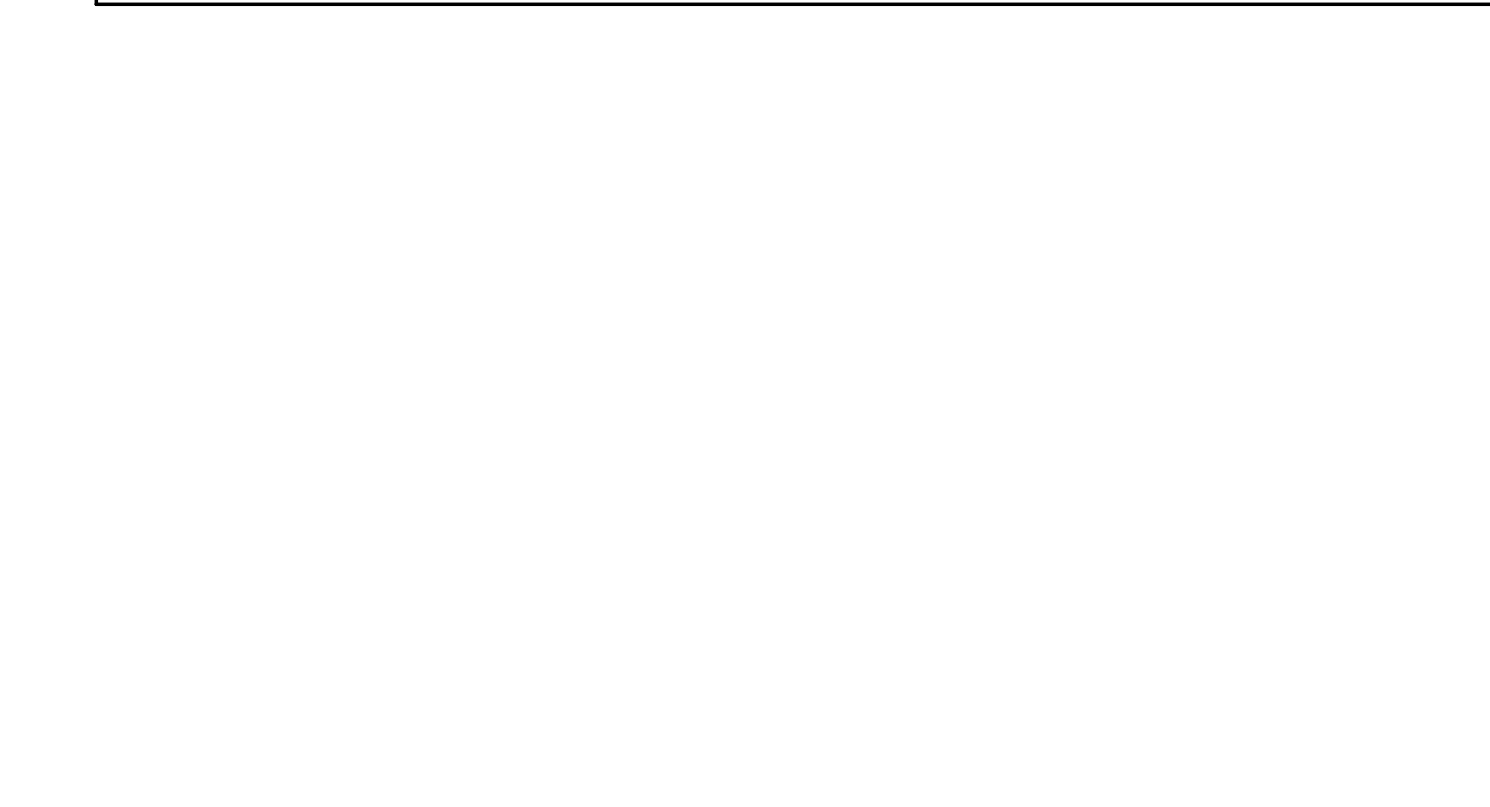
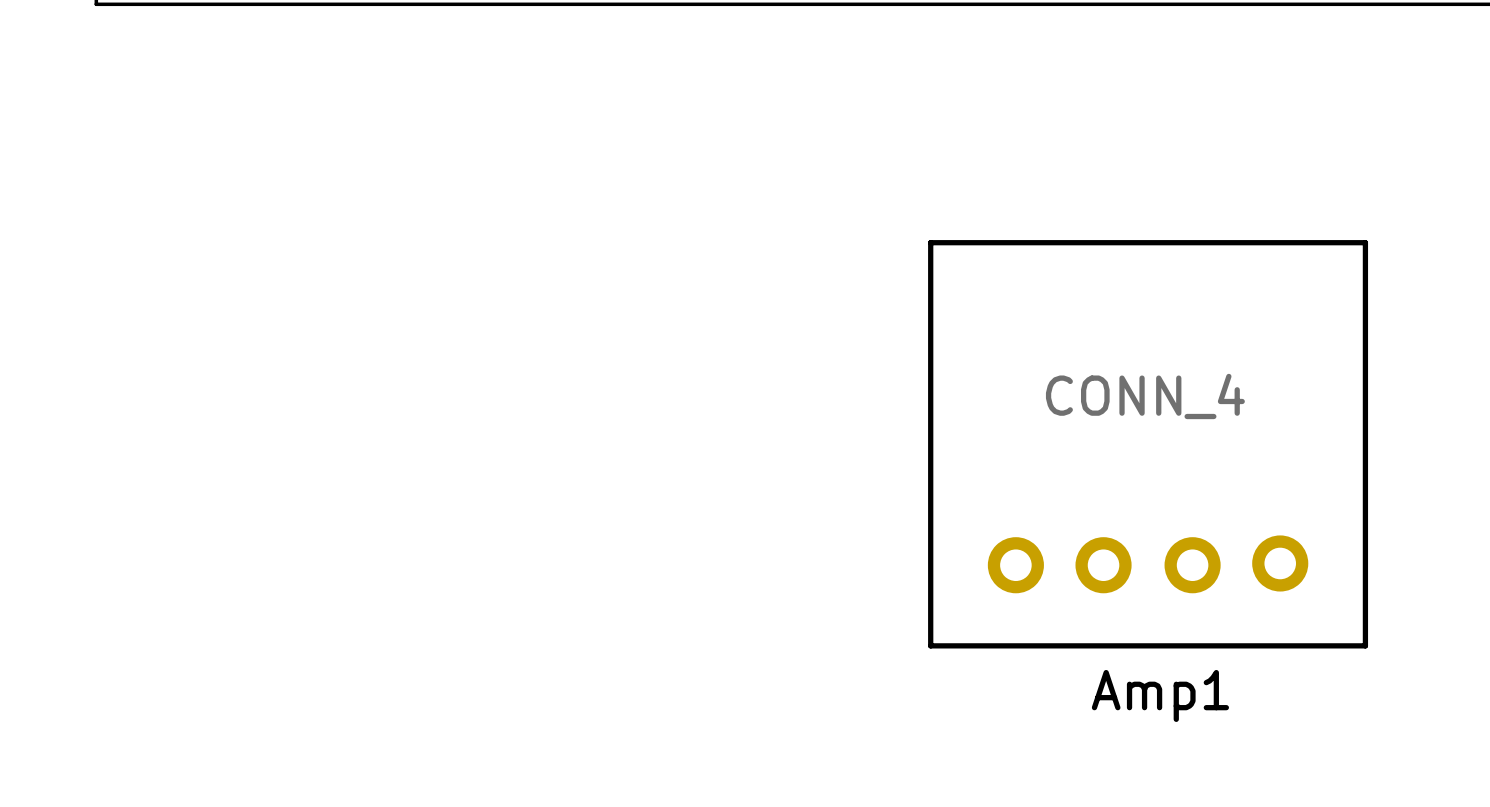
Amp1: none -> CONN_4 (1148, 444)

